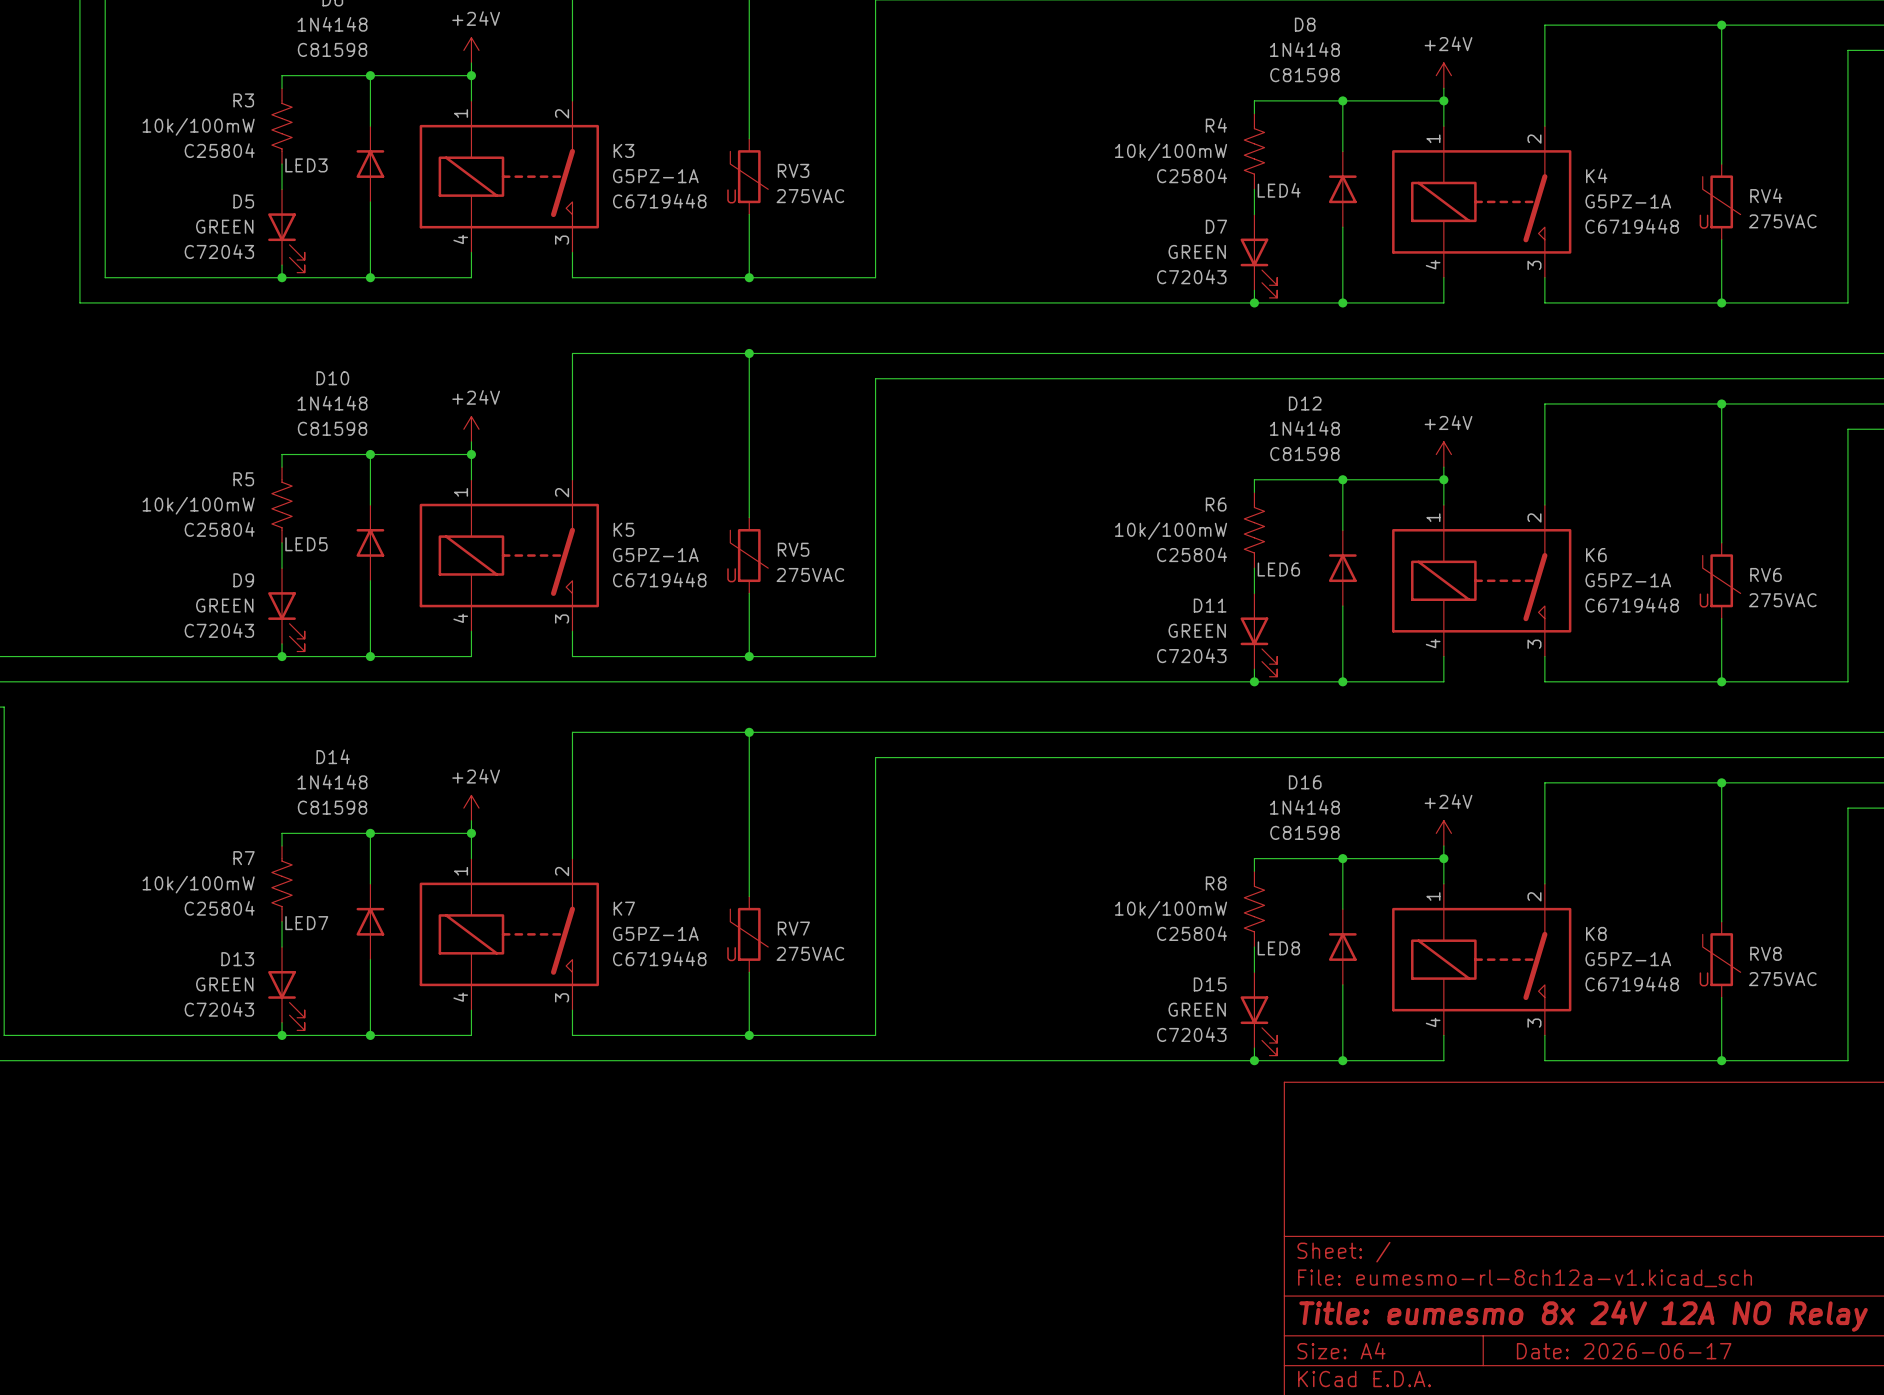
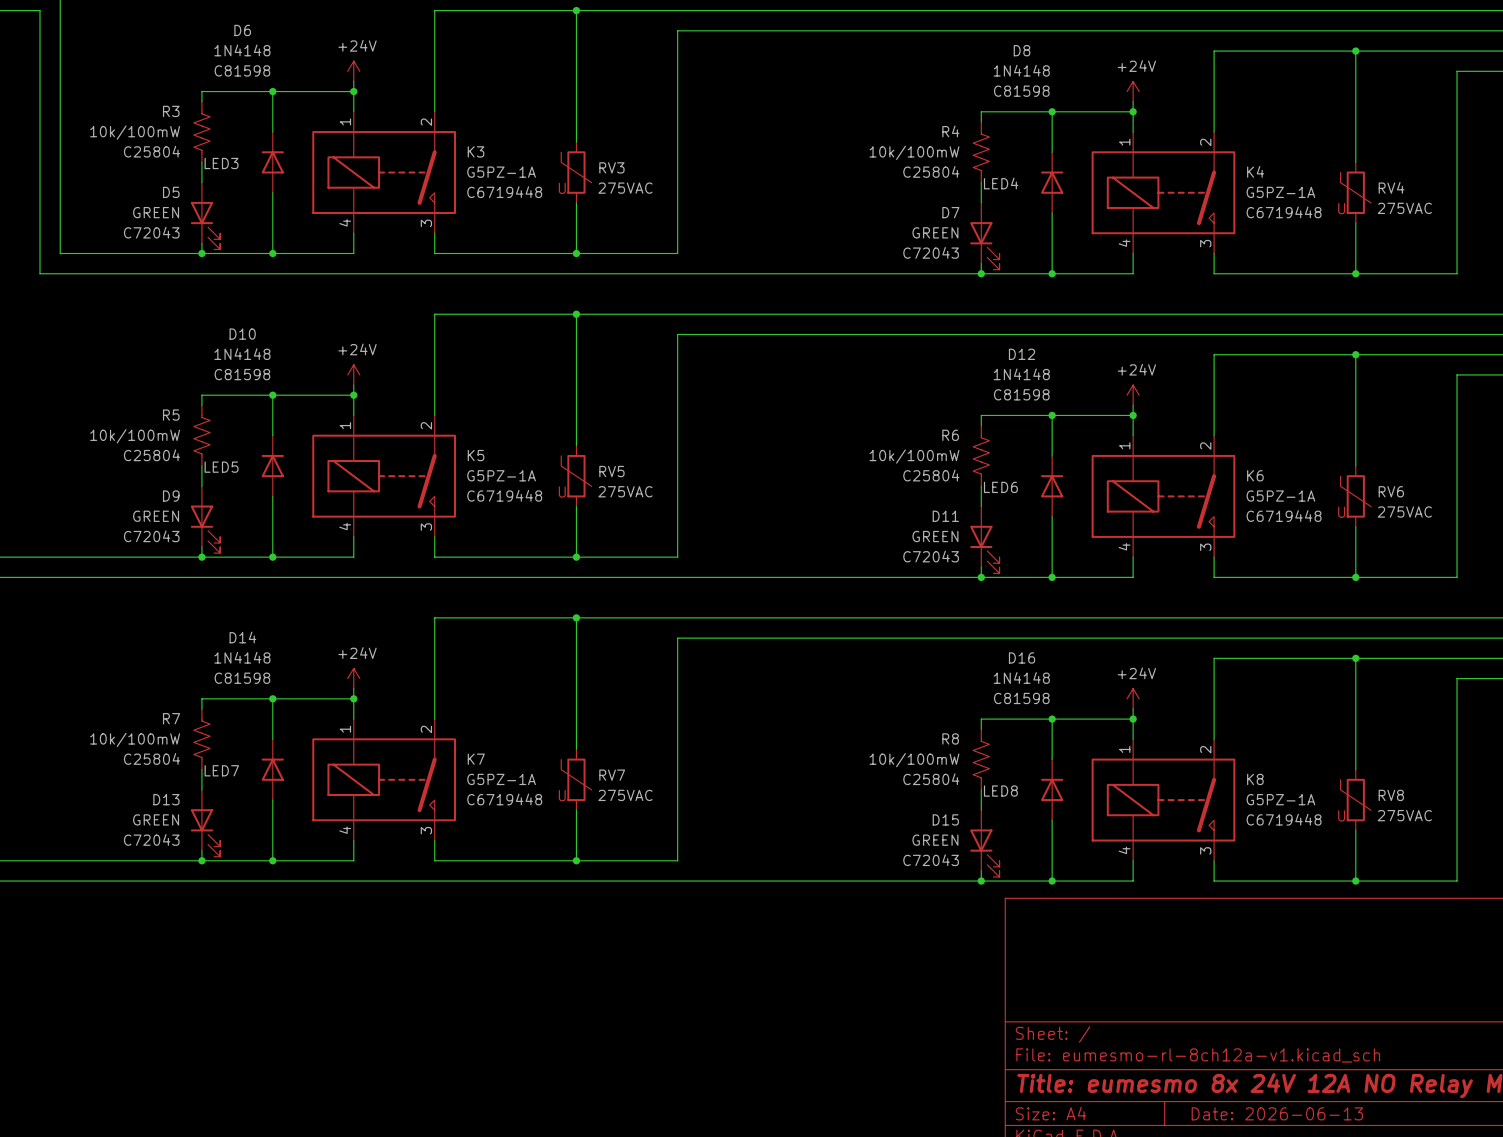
title block: Date: 2026-06-17 (1624, 1351) -> Date: 2026-06-13 (1277, 1113)

